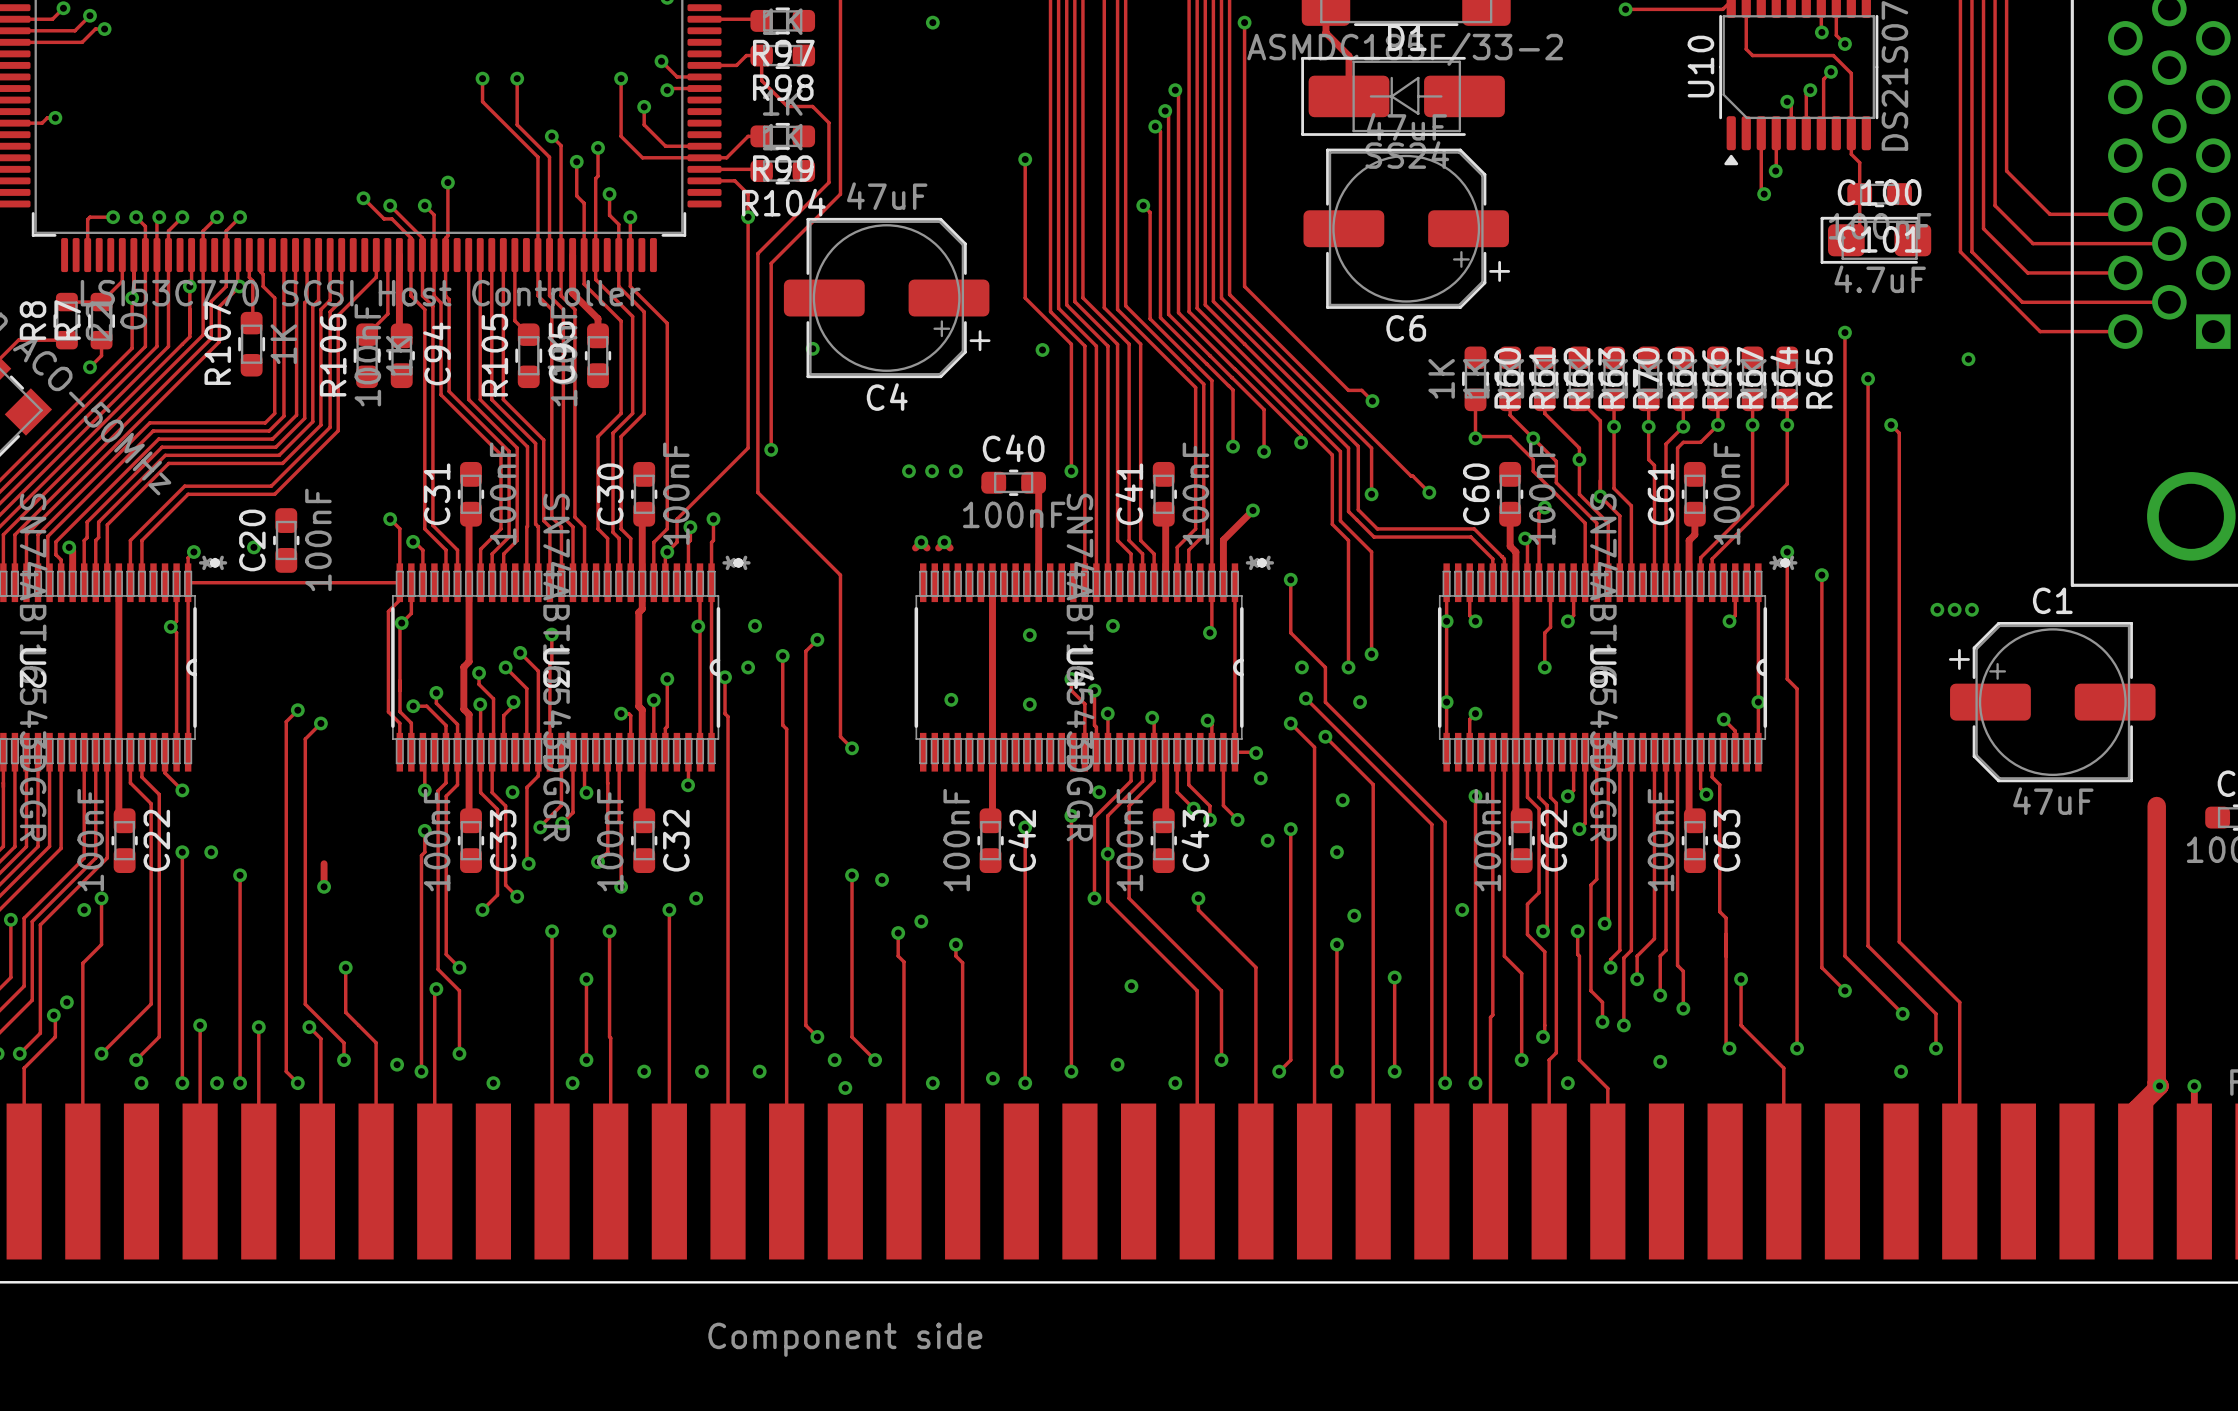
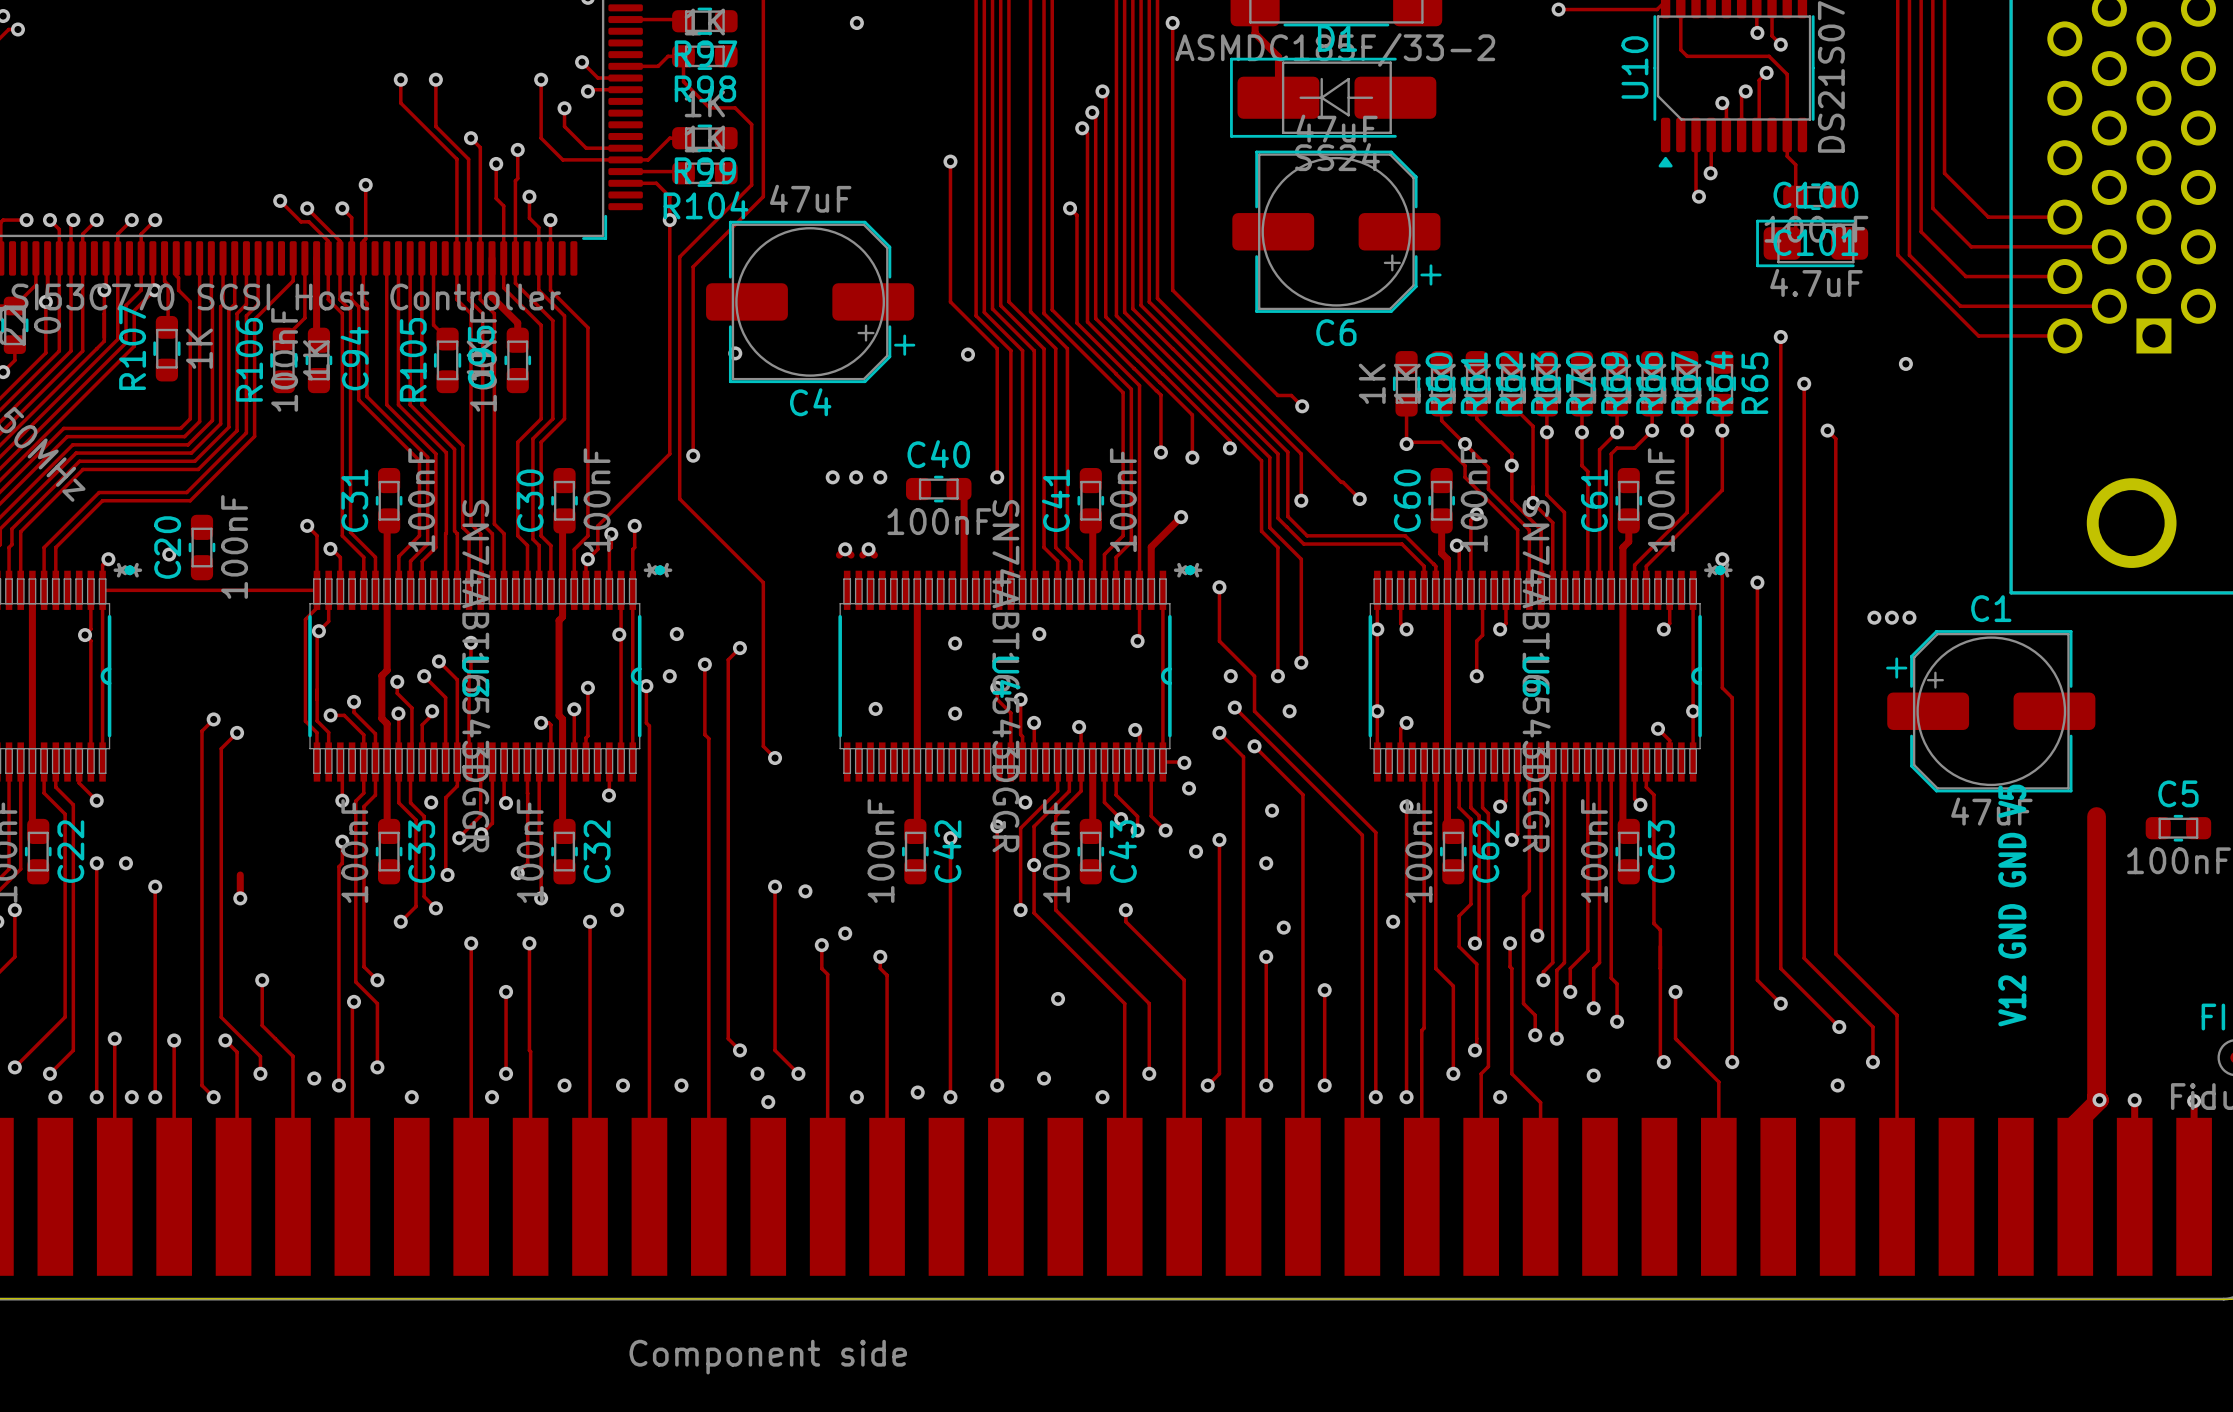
text: none -> V12 GND GND V5 (2012, 905)

